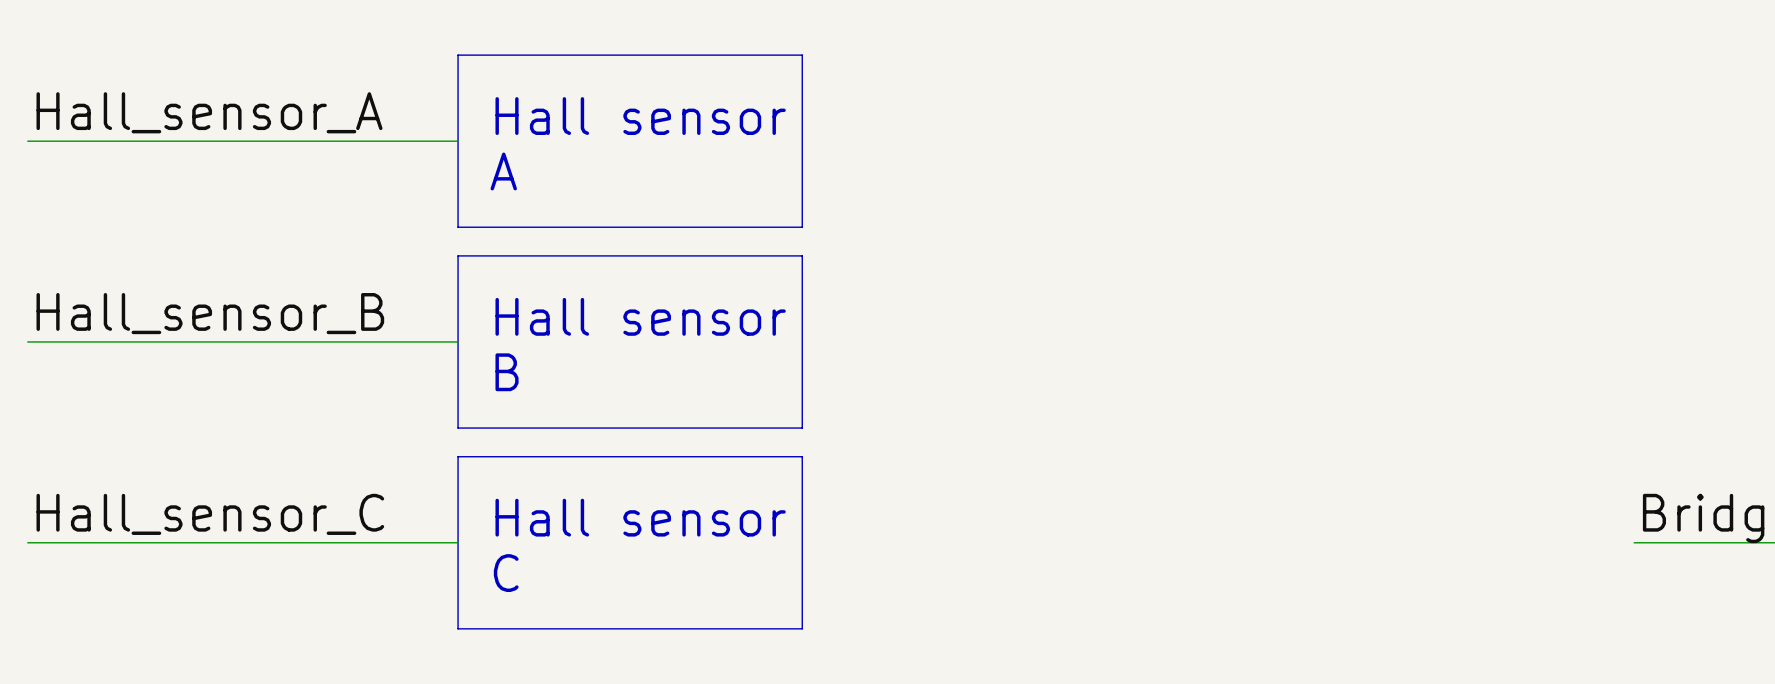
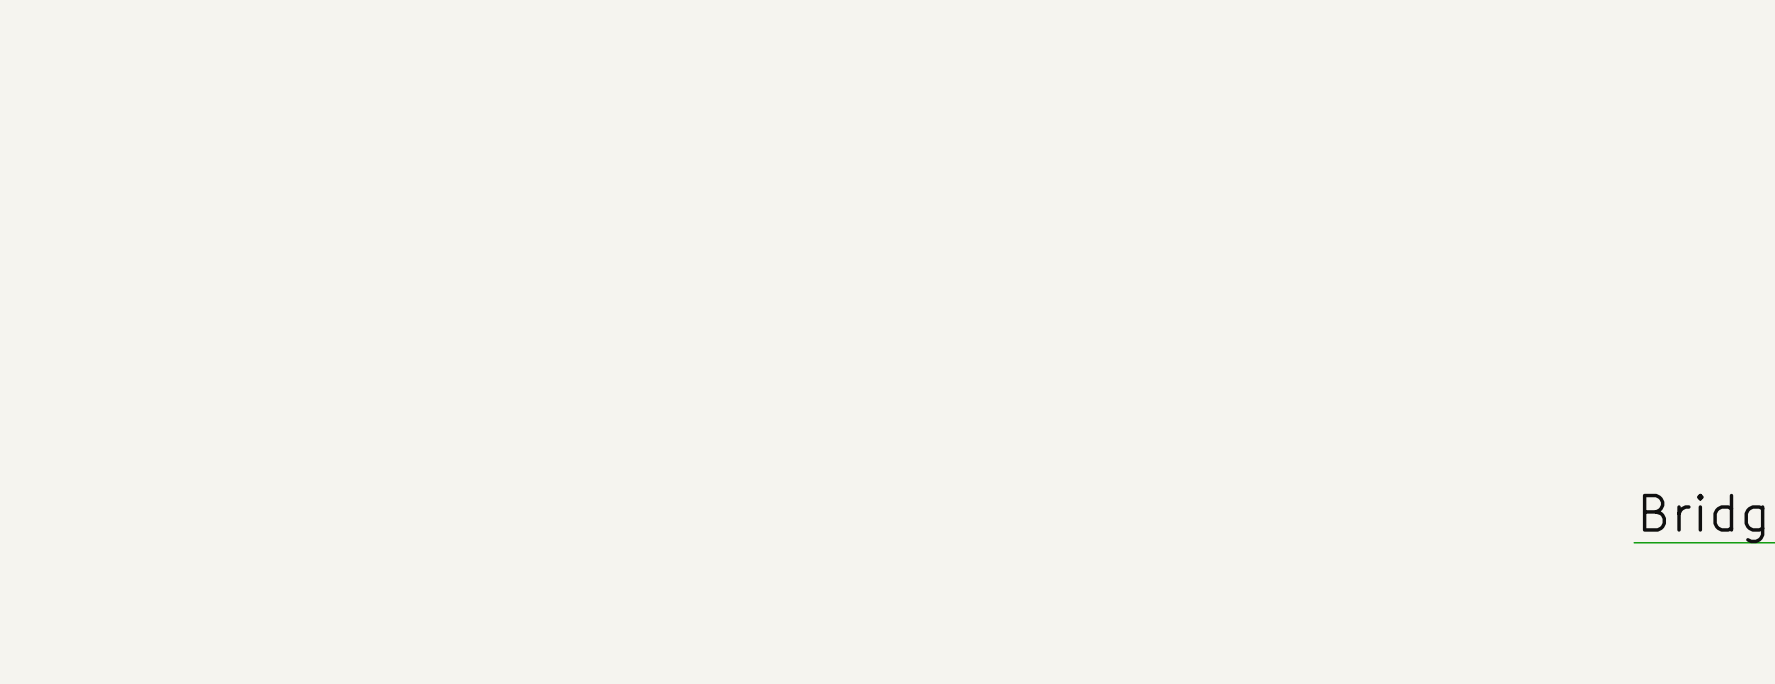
bus: (458, 55) (802, 55) (802, 227) (458, 227) (458, 55) -> none
label: Hall_sensor_A (209, 112) -> none
text: Hall sensor (640, 116) -> none
wire: (27, 141) (458, 141) -> none
text: A (503, 171) -> none
bus: (458, 255) (458, 428) (802, 428) (802, 255) (458, 255) -> none
label: Hall_sensor_B (210, 313) -> none
text: Hall sensor (640, 316) -> none
wire: (27, 341) (458, 341) -> none
text: B (507, 372) -> none
bus: (458, 456) (458, 628) (802, 628) (802, 456) (458, 456) -> none
label: Hall_sensor_C (210, 514) -> none
text: Hall sensor (640, 517) -> none
wire: (27, 542) (458, 542) -> none
text: C (506, 573) -> none

